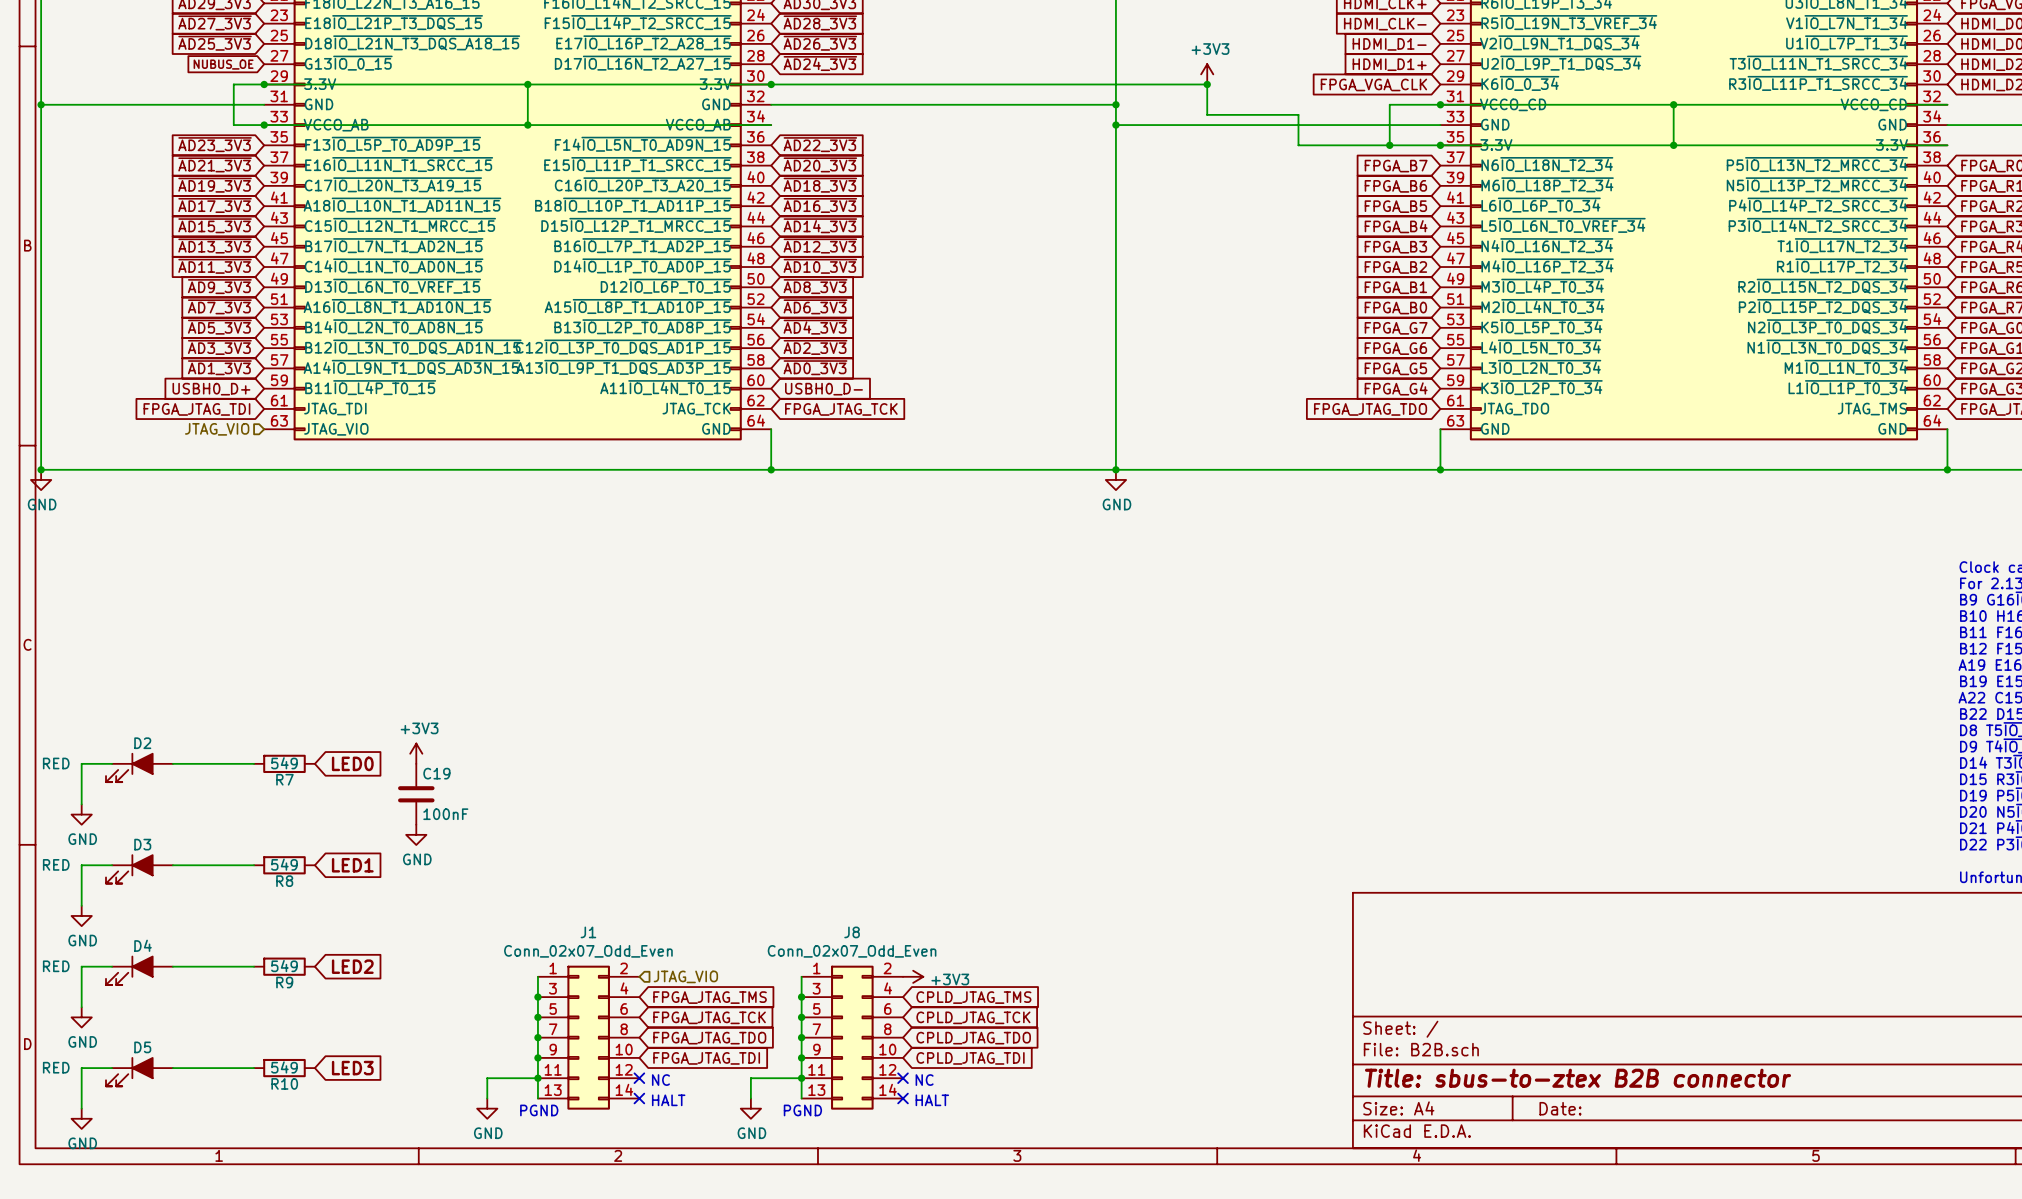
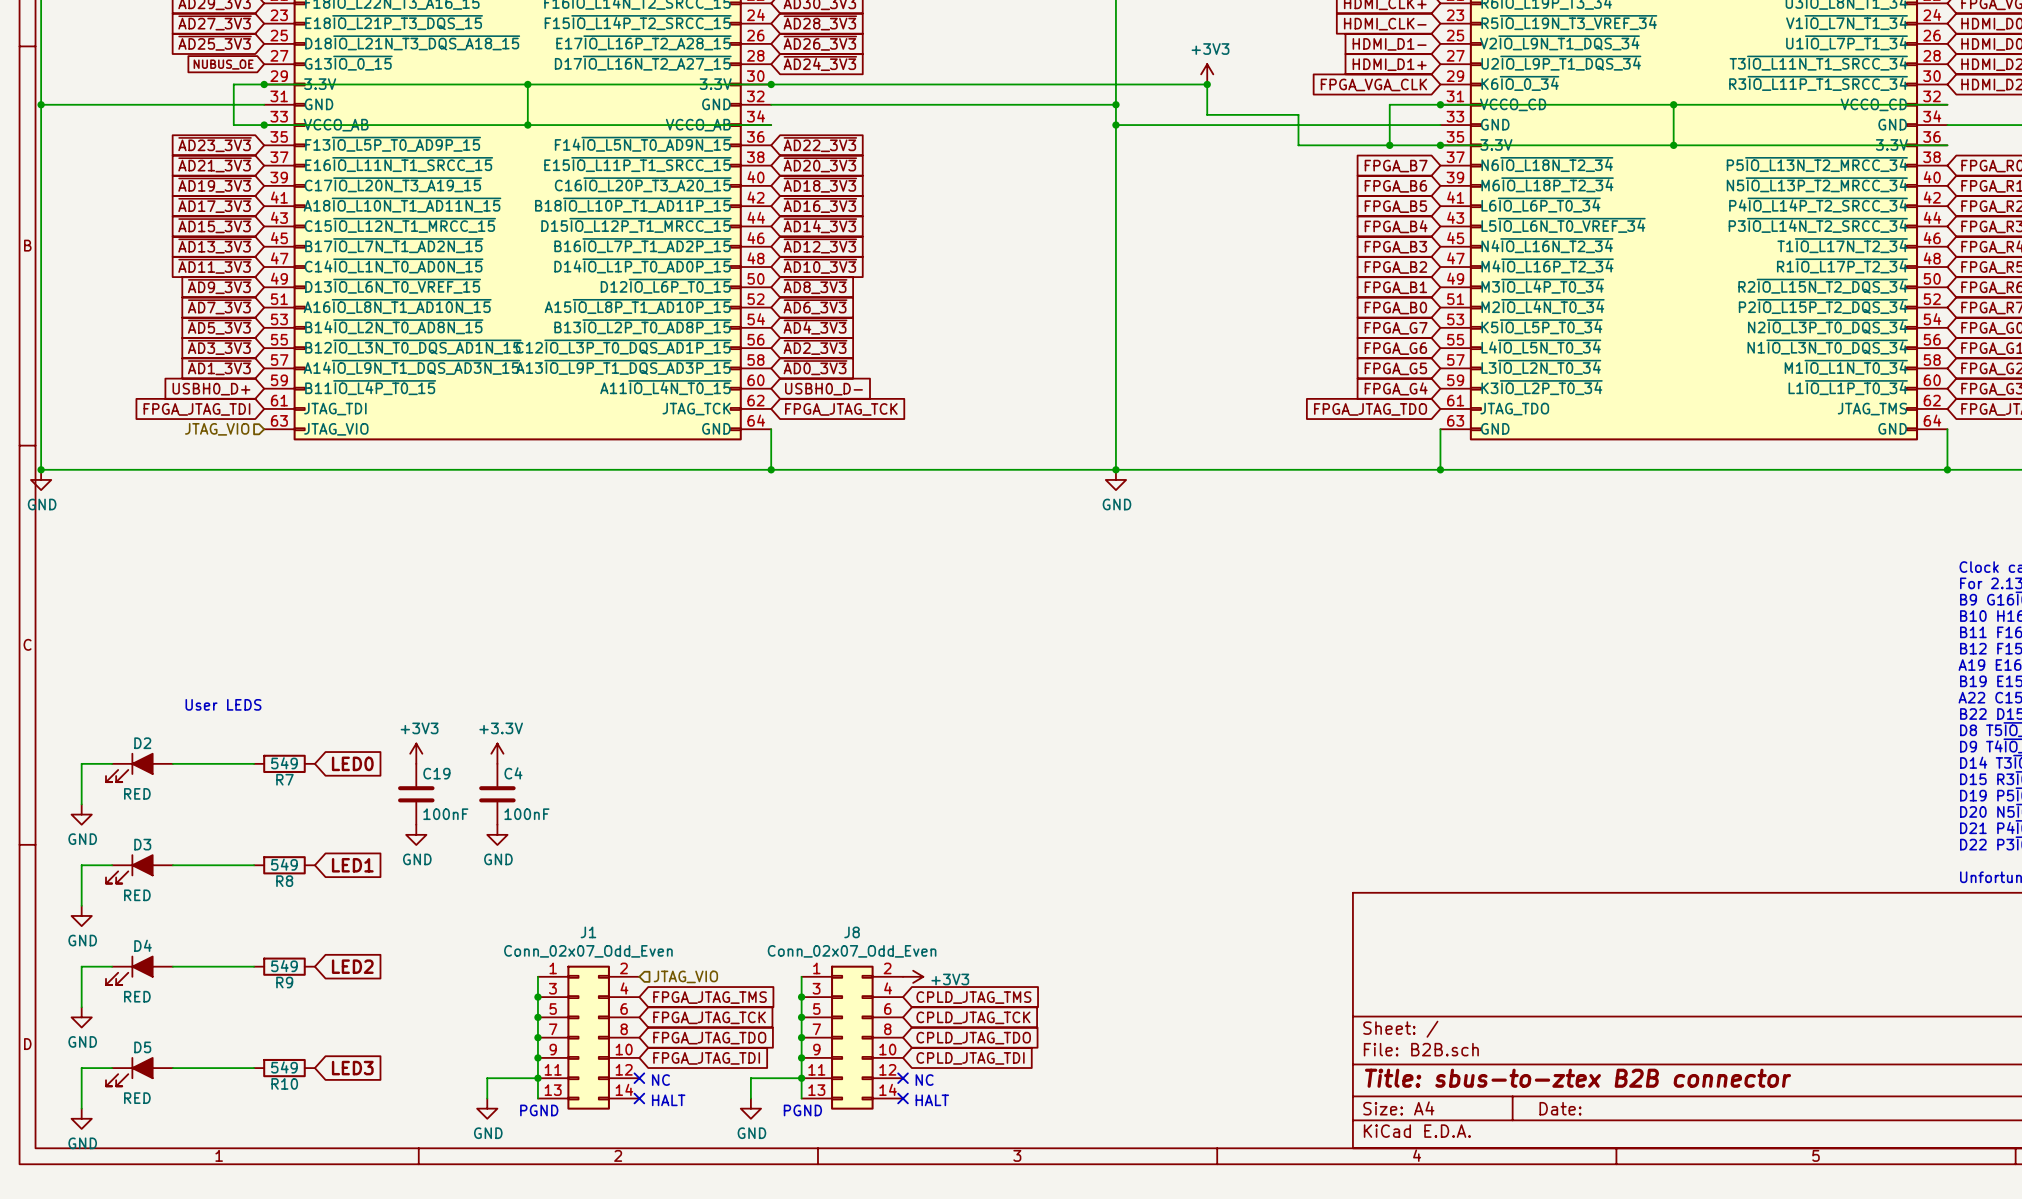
text: none -> User LEDS (223, 704)
power symbol: none -> +3.3V (497, 753)
D2 value position: RED (56, 763) -> RED (137, 793)
C4: none -> 100nF (497, 794)
power symbol: none -> GND (497, 834)
D3 value position: RED (56, 864) -> RED (137, 895)
D4 value position: RED (56, 966) -> RED (137, 996)
D5 value position: RED (56, 1067) -> RED (137, 1098)

